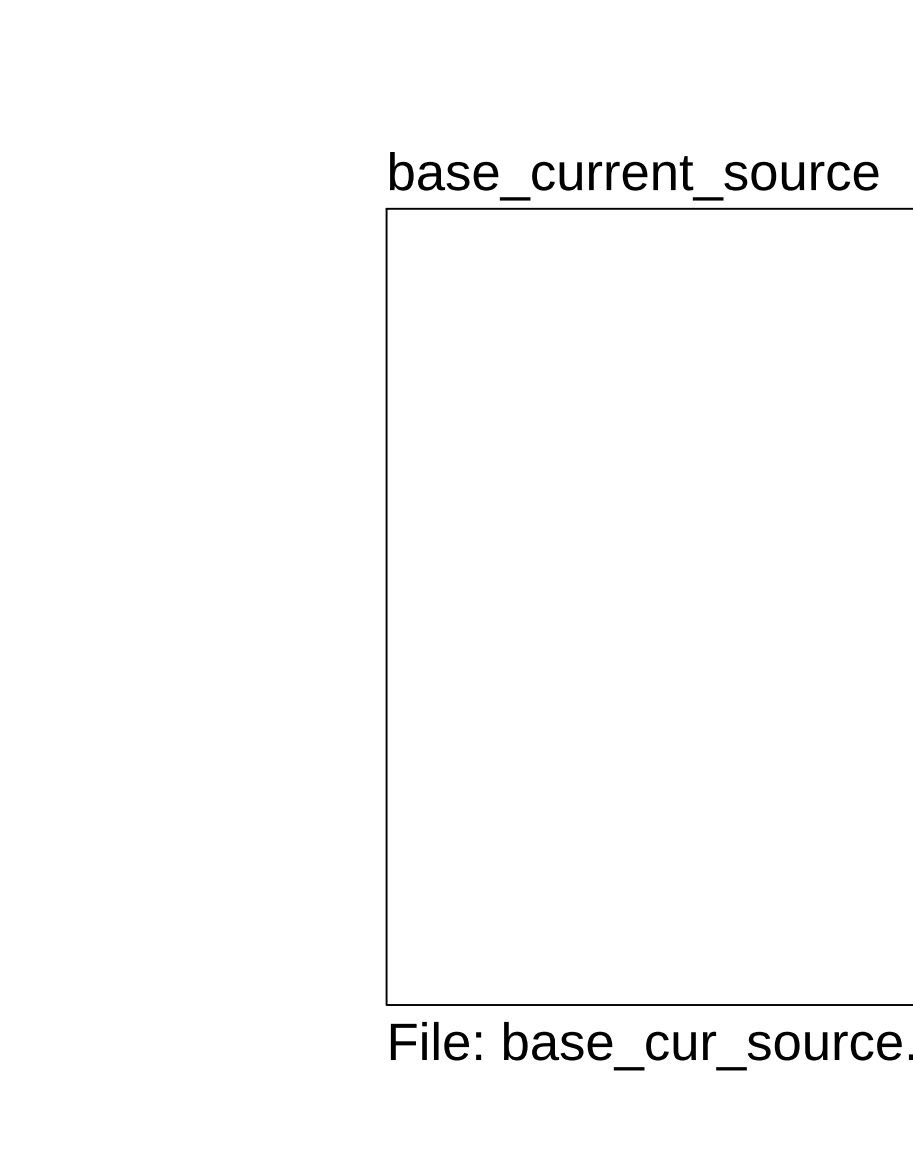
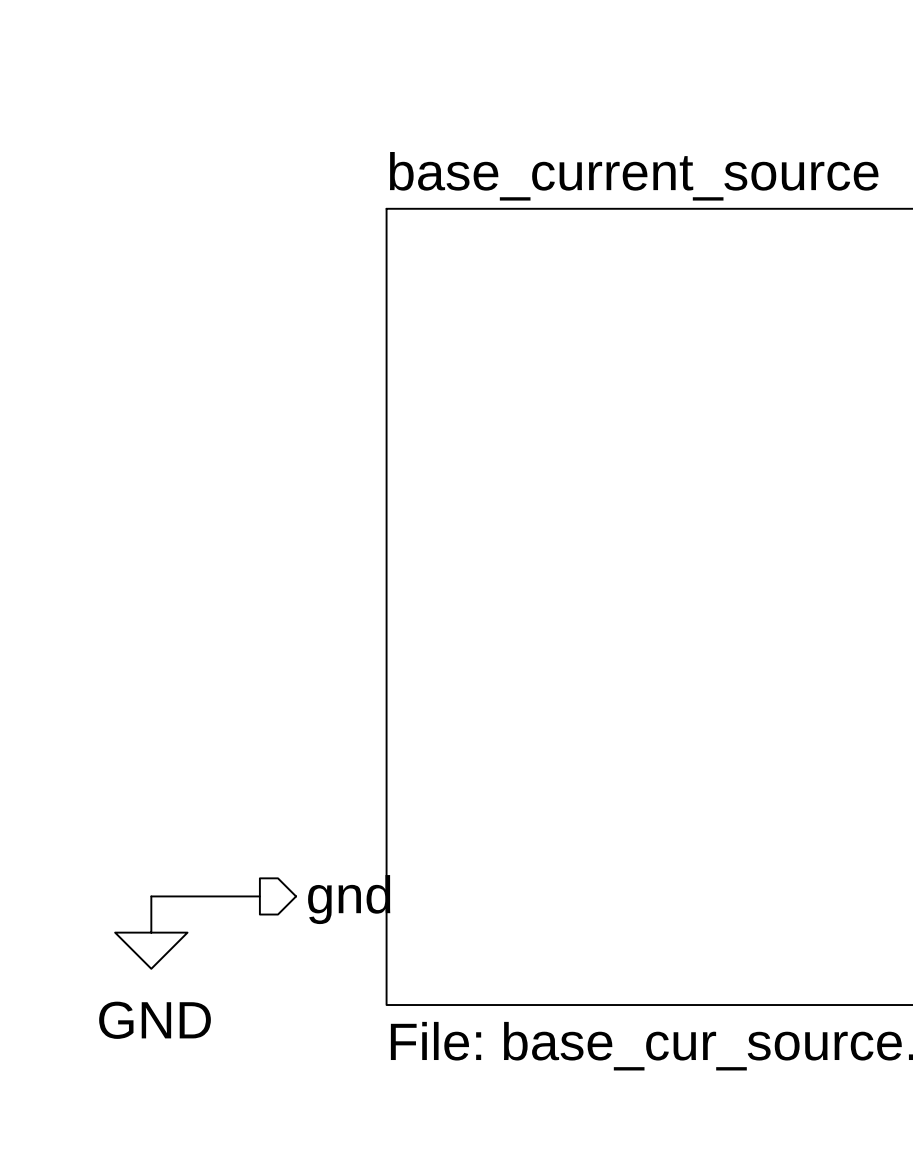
wire: none -> (151, 896) (259, 896)
sheet pin: none -> gnd (349, 899)
power symbol: none -> GND (151, 932)

